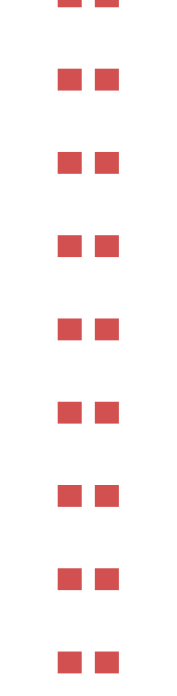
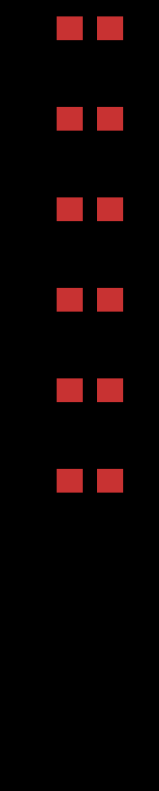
part: (88, 495) -> none
part: (88, 579) -> none
part: (88, 662) -> none

